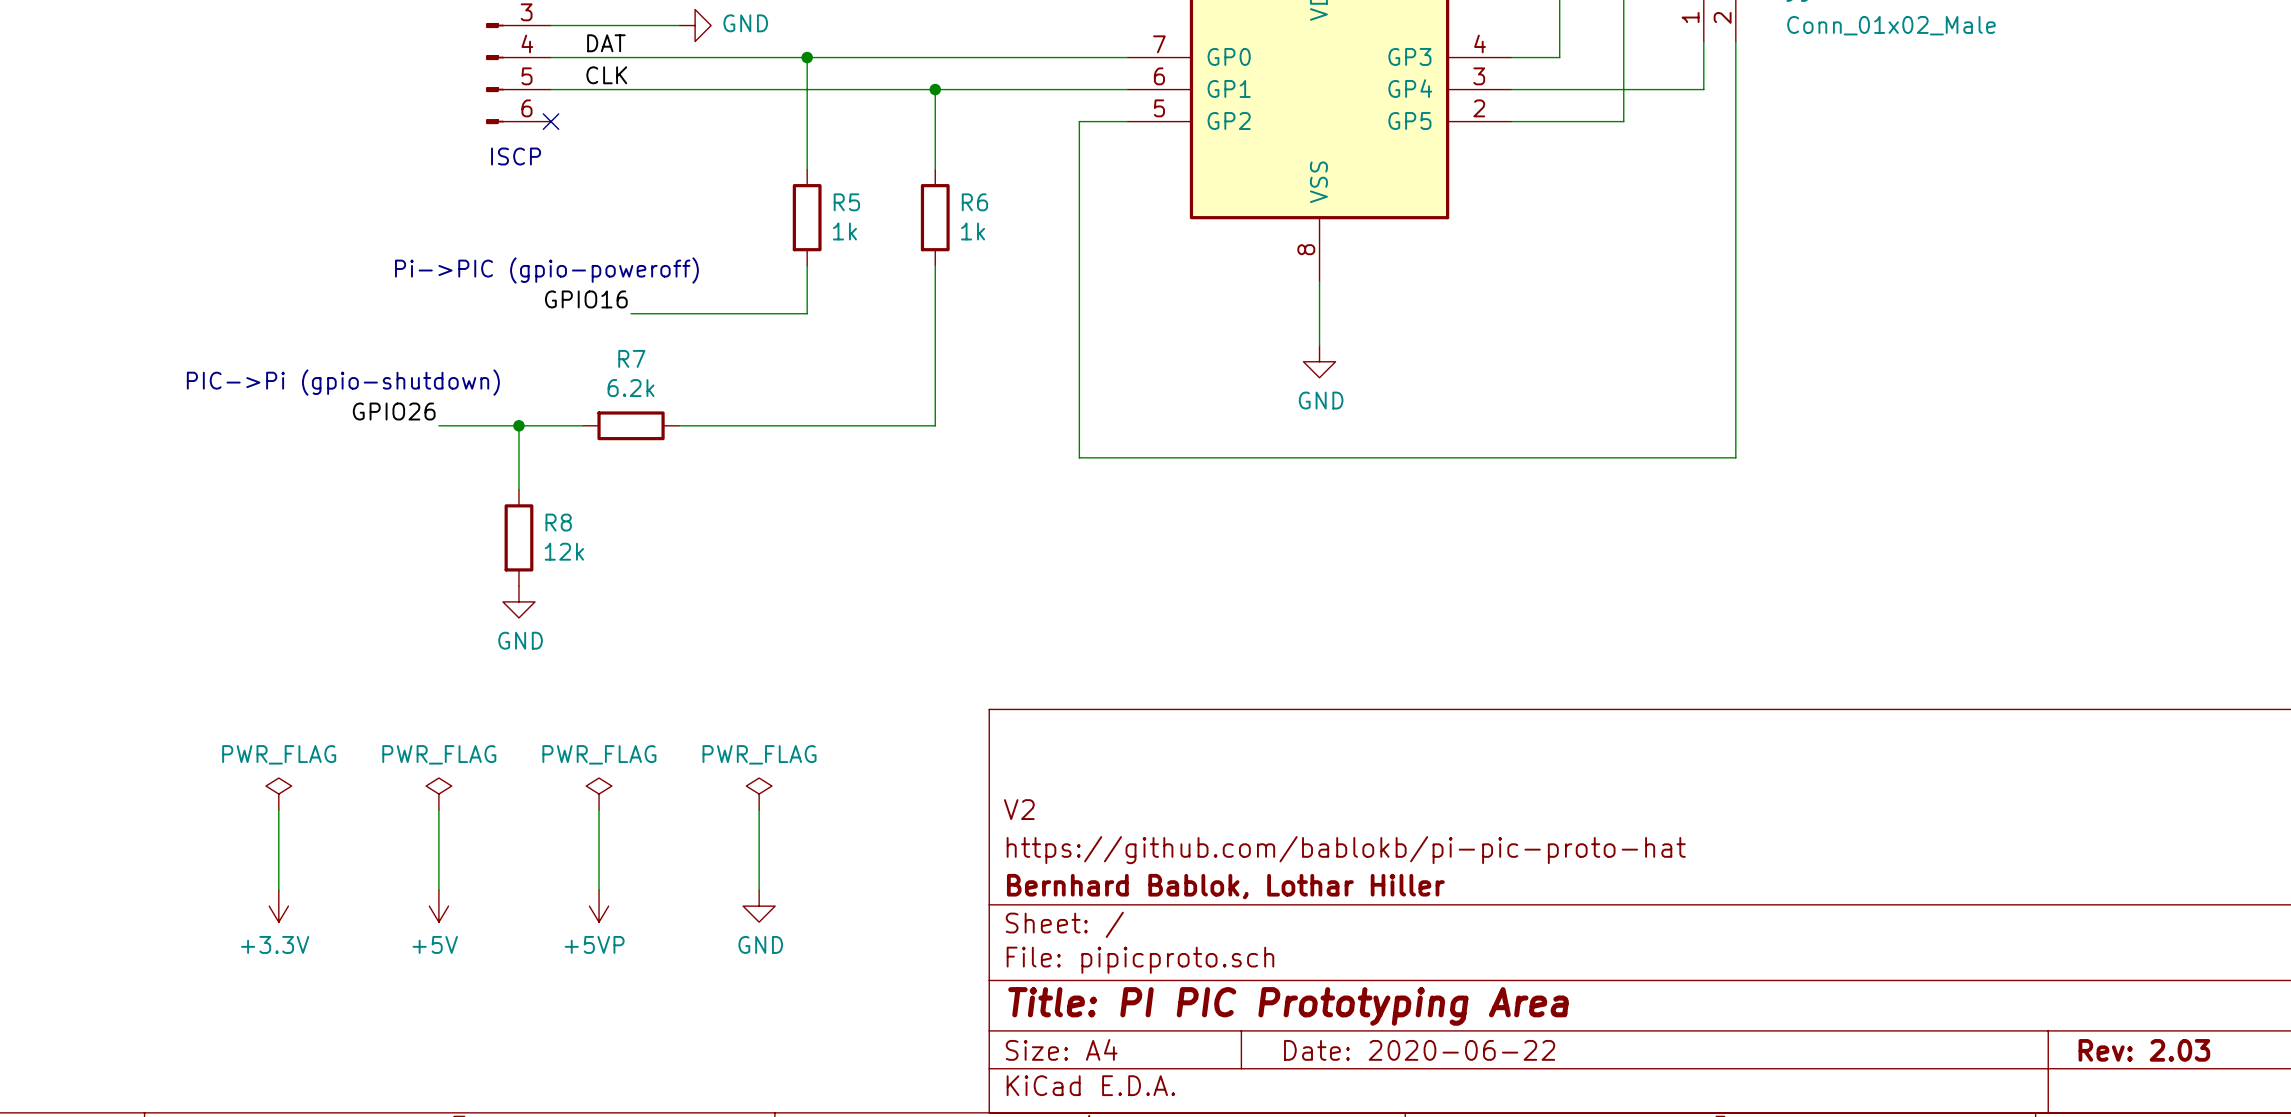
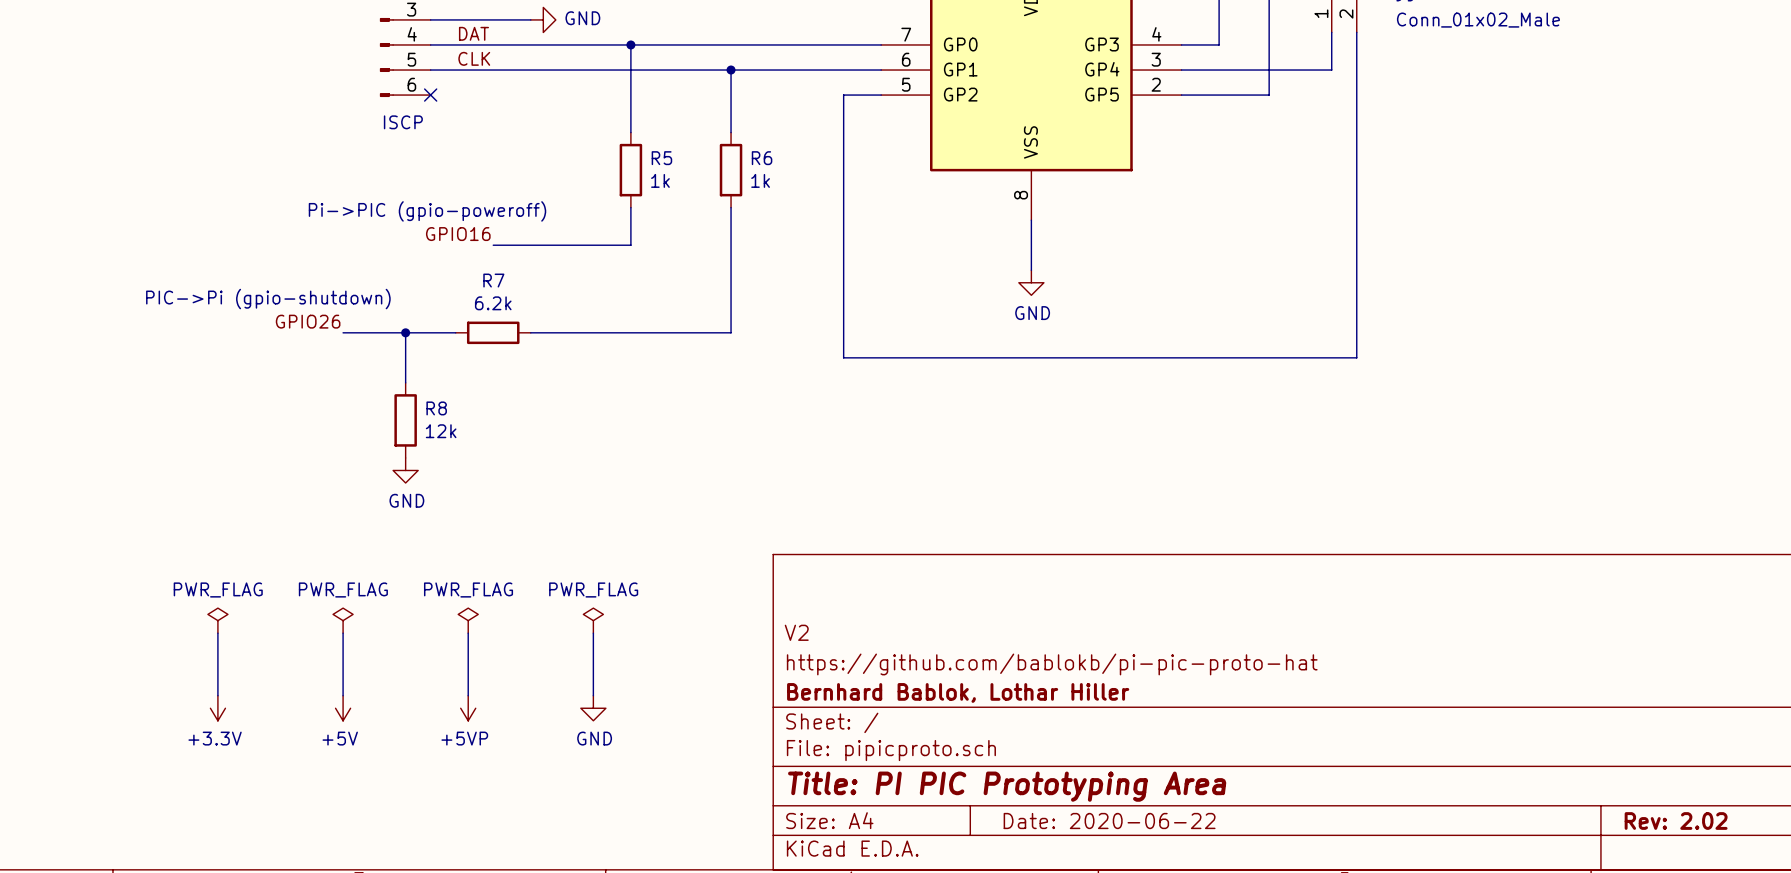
title block: Rev: 2.03 (2144, 1050) -> Rev: 2.02 (1676, 821)

